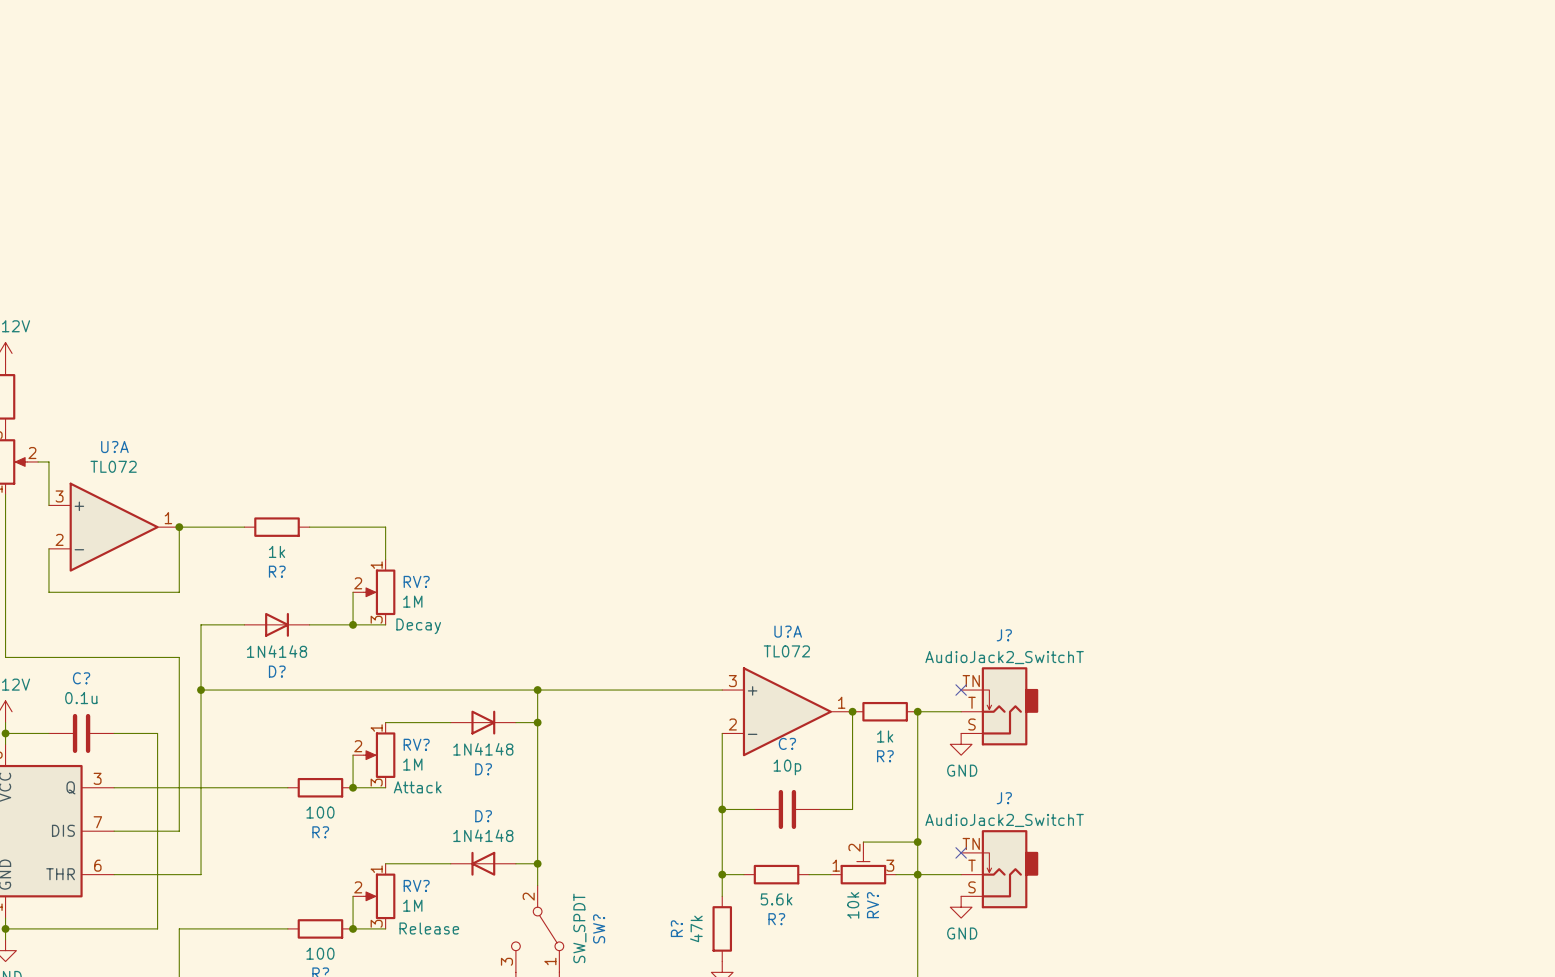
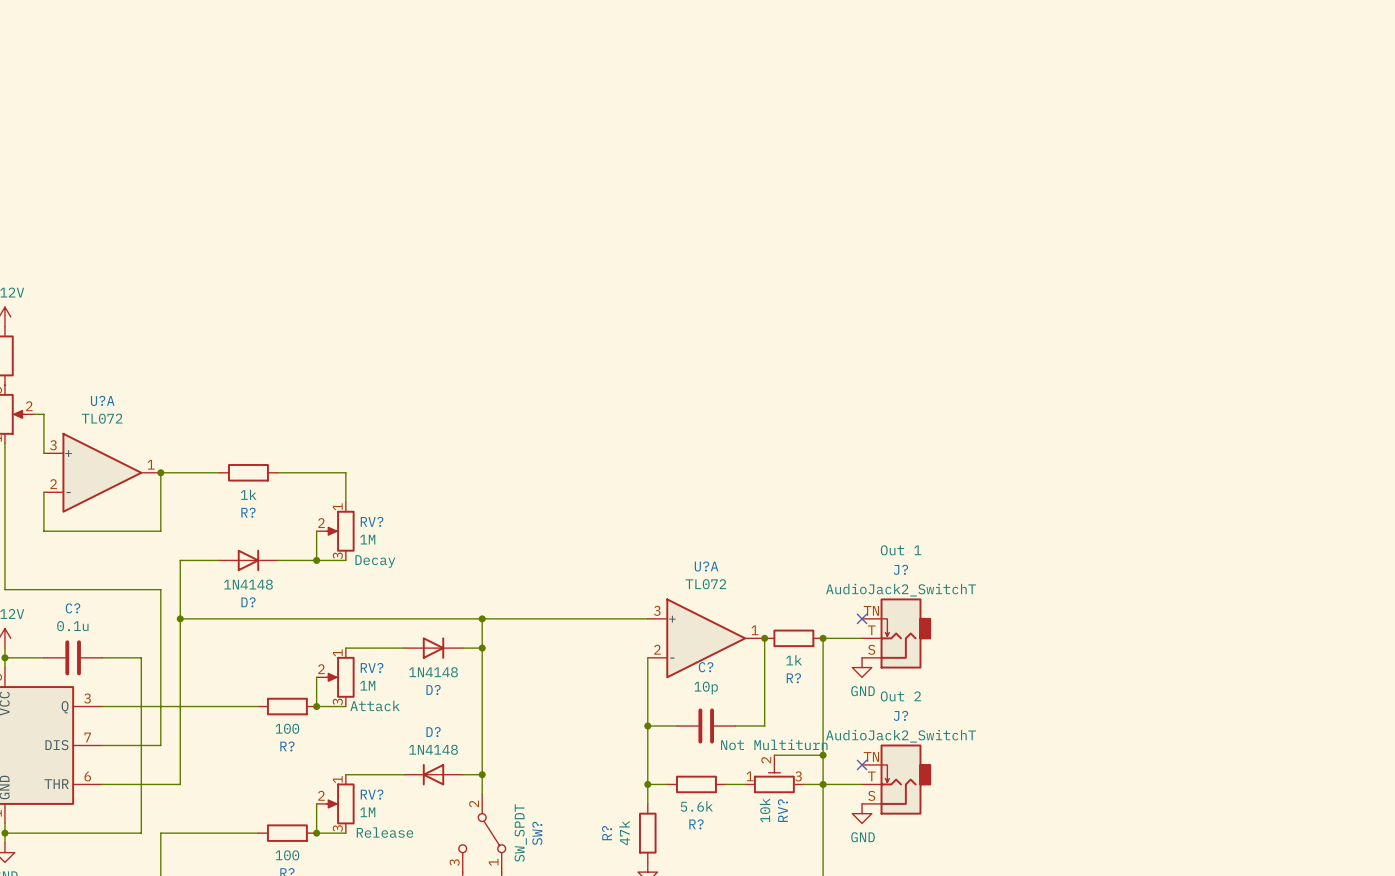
J? text: none -> Out 1 (901, 550)
J? text: none -> Out 2 (900, 696)
RV? text: none -> Not Multiturn (774, 744)

